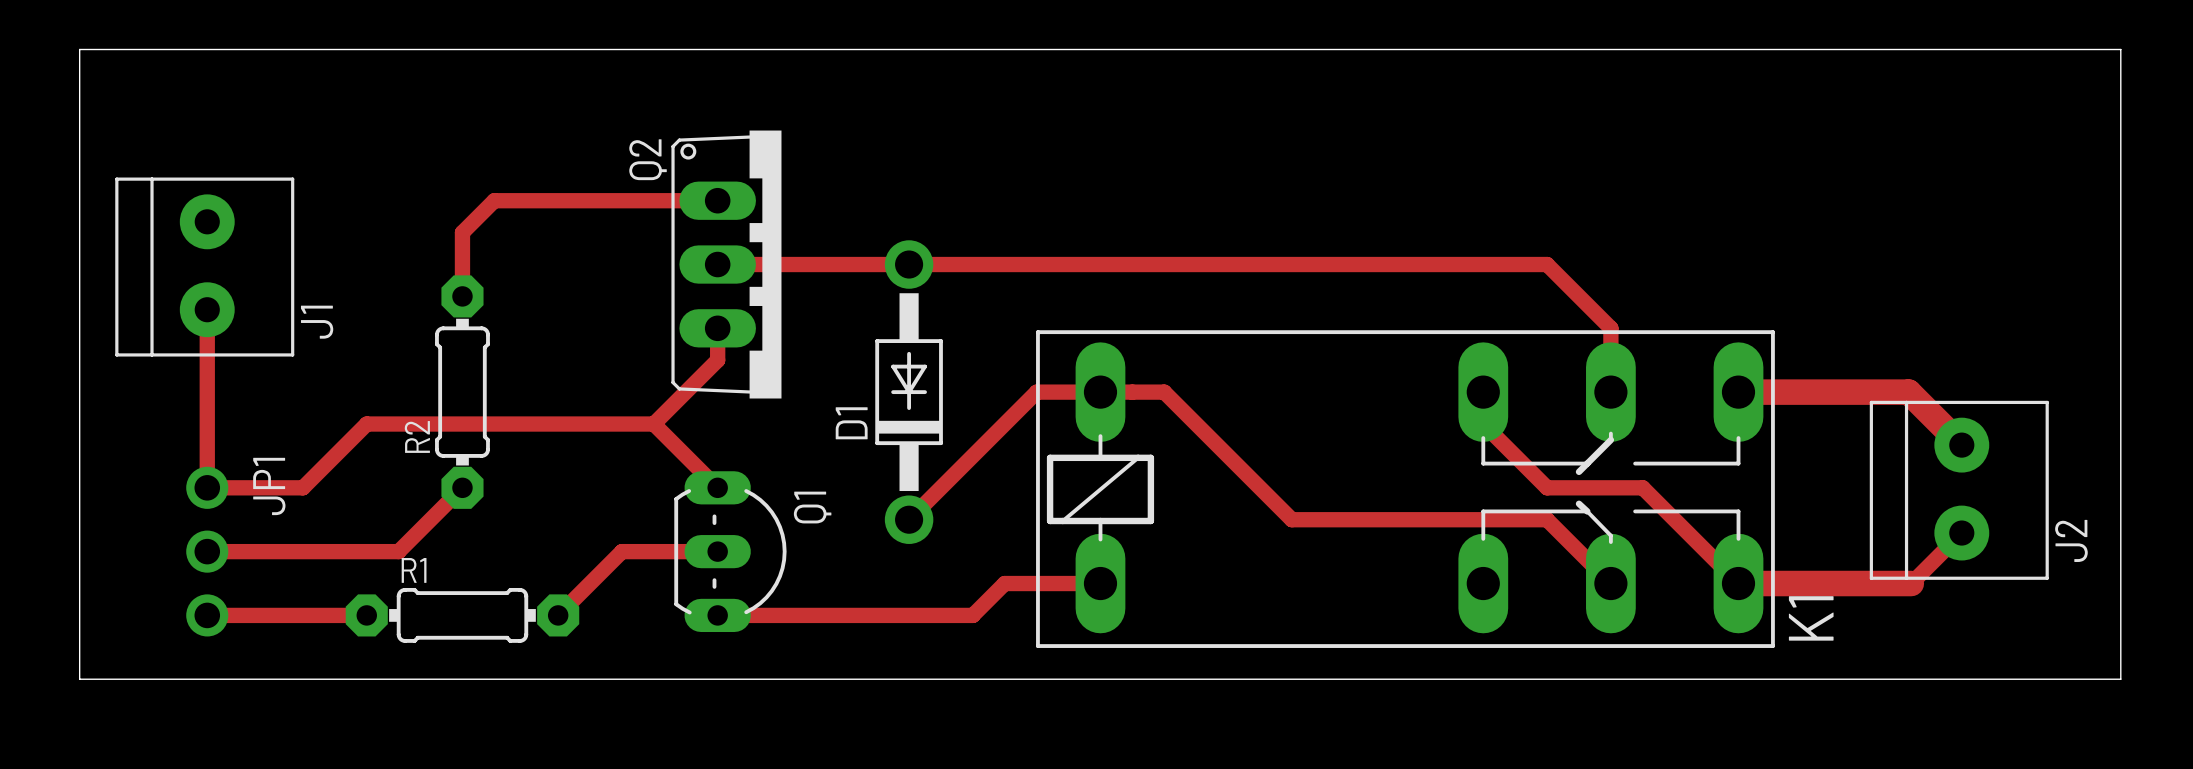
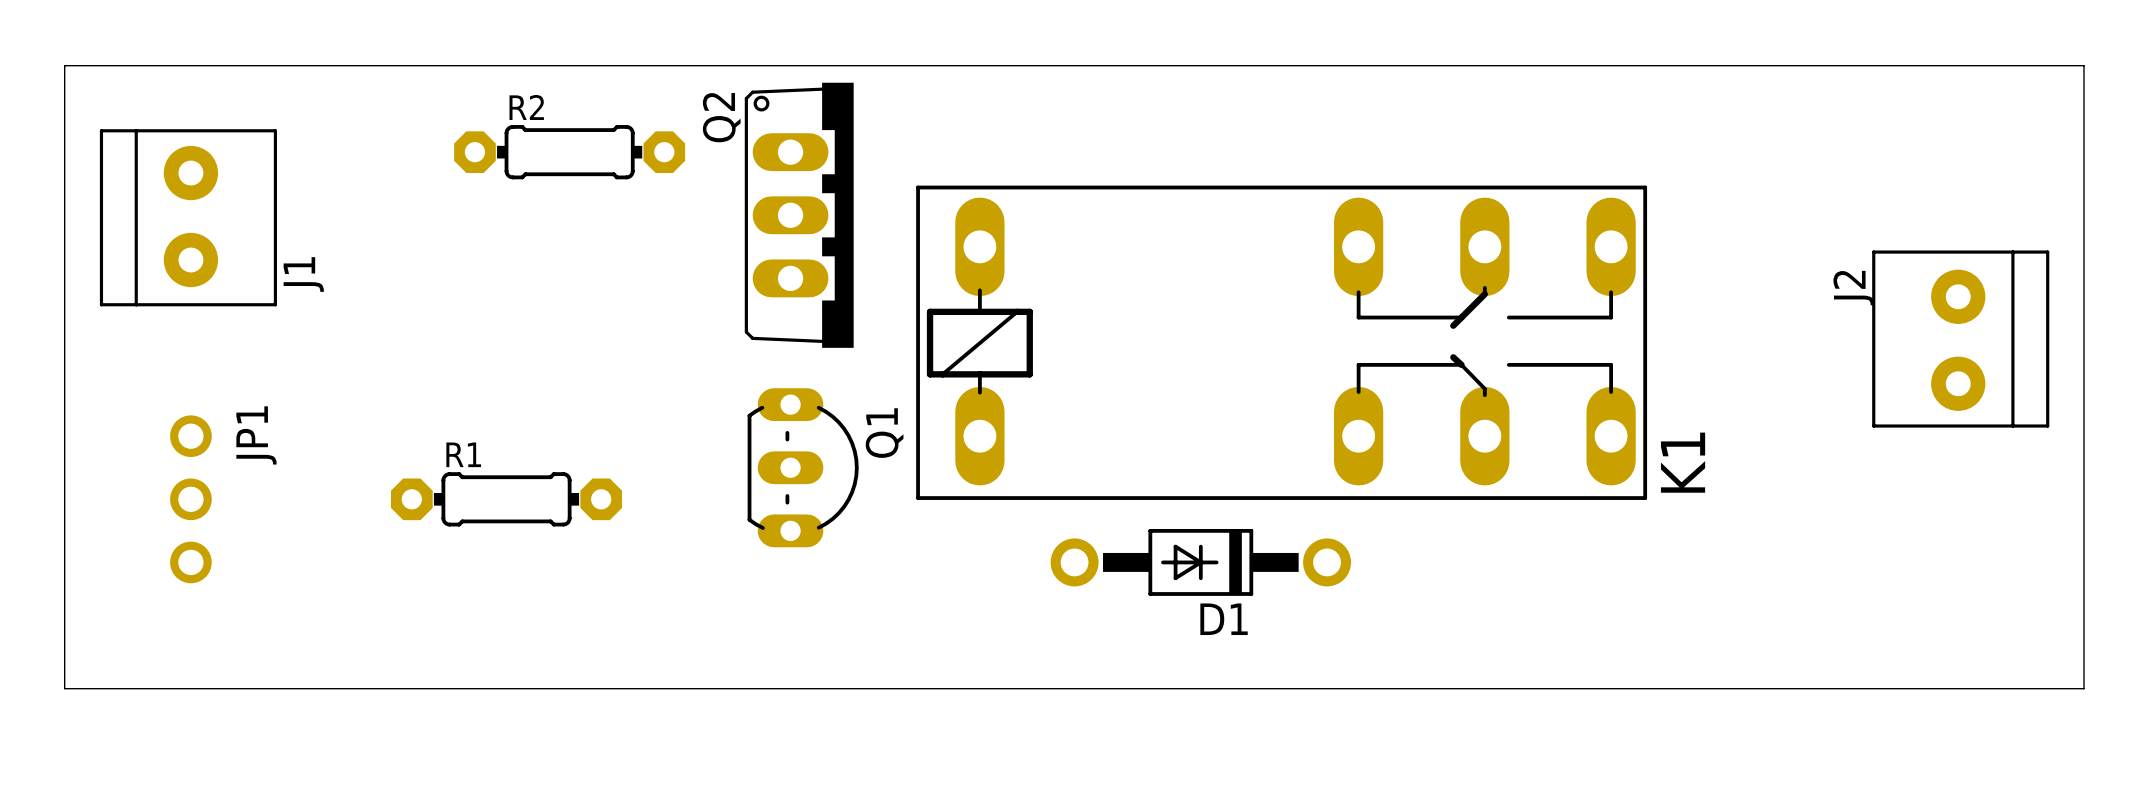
track: (717, 200) (494, 200) (462, 232) (462, 296) -> none
track: (717, 264) (1547, 264) (1610, 328) (1610, 392) -> none
Q2 position: (726, 264) -> (799, 215)
J1 position: (204, 267) -> (188, 217)
track: (207, 309) (207, 487) (302, 487) (366, 424) (653, 424) -> none
track: (717, 328) (717, 360) (653, 424) -> none
R2 rotation: 0° (462, 392) -> 90° clockwise (569, 152)
R2 position: (462, 392) -> (569, 152)
D1 rotation: 0° (909, 392) -> 90° counterclockwise (1200, 562)
D1 position: (909, 392) -> (1200, 562)
track: (1483, 392) (1483, 424) (1547, 487) (1642, 487) (1738, 583) (1911, 583) (1961, 533) -> none
track: (1738, 392) (1908, 392) (1961, 445) -> none
track: (653, 424) (717, 487) -> none
track: (462, 487) (398, 551) (207, 551) -> none
K1 position: (1405, 489) -> (1281, 342)
J2 rotation: 0° (1959, 490) -> 180° (1960, 339)
J2 position: (1959, 490) -> (1960, 339)
track: (909, 519) (1036, 392) (1164, 392) (1291, 519) (1547, 519) (1610, 583) -> none
JP1 position: (207, 551) -> (190, 499)
track: (717, 551) (621, 551) (558, 615) -> none
Q1 position: (730, 551) -> (803, 467)
track: (1100, 583) (1004, 583) (972, 615) (717, 615) -> none
track: (207, 615) (366, 615) -> none
R1 position: (462, 615) -> (506, 499)

